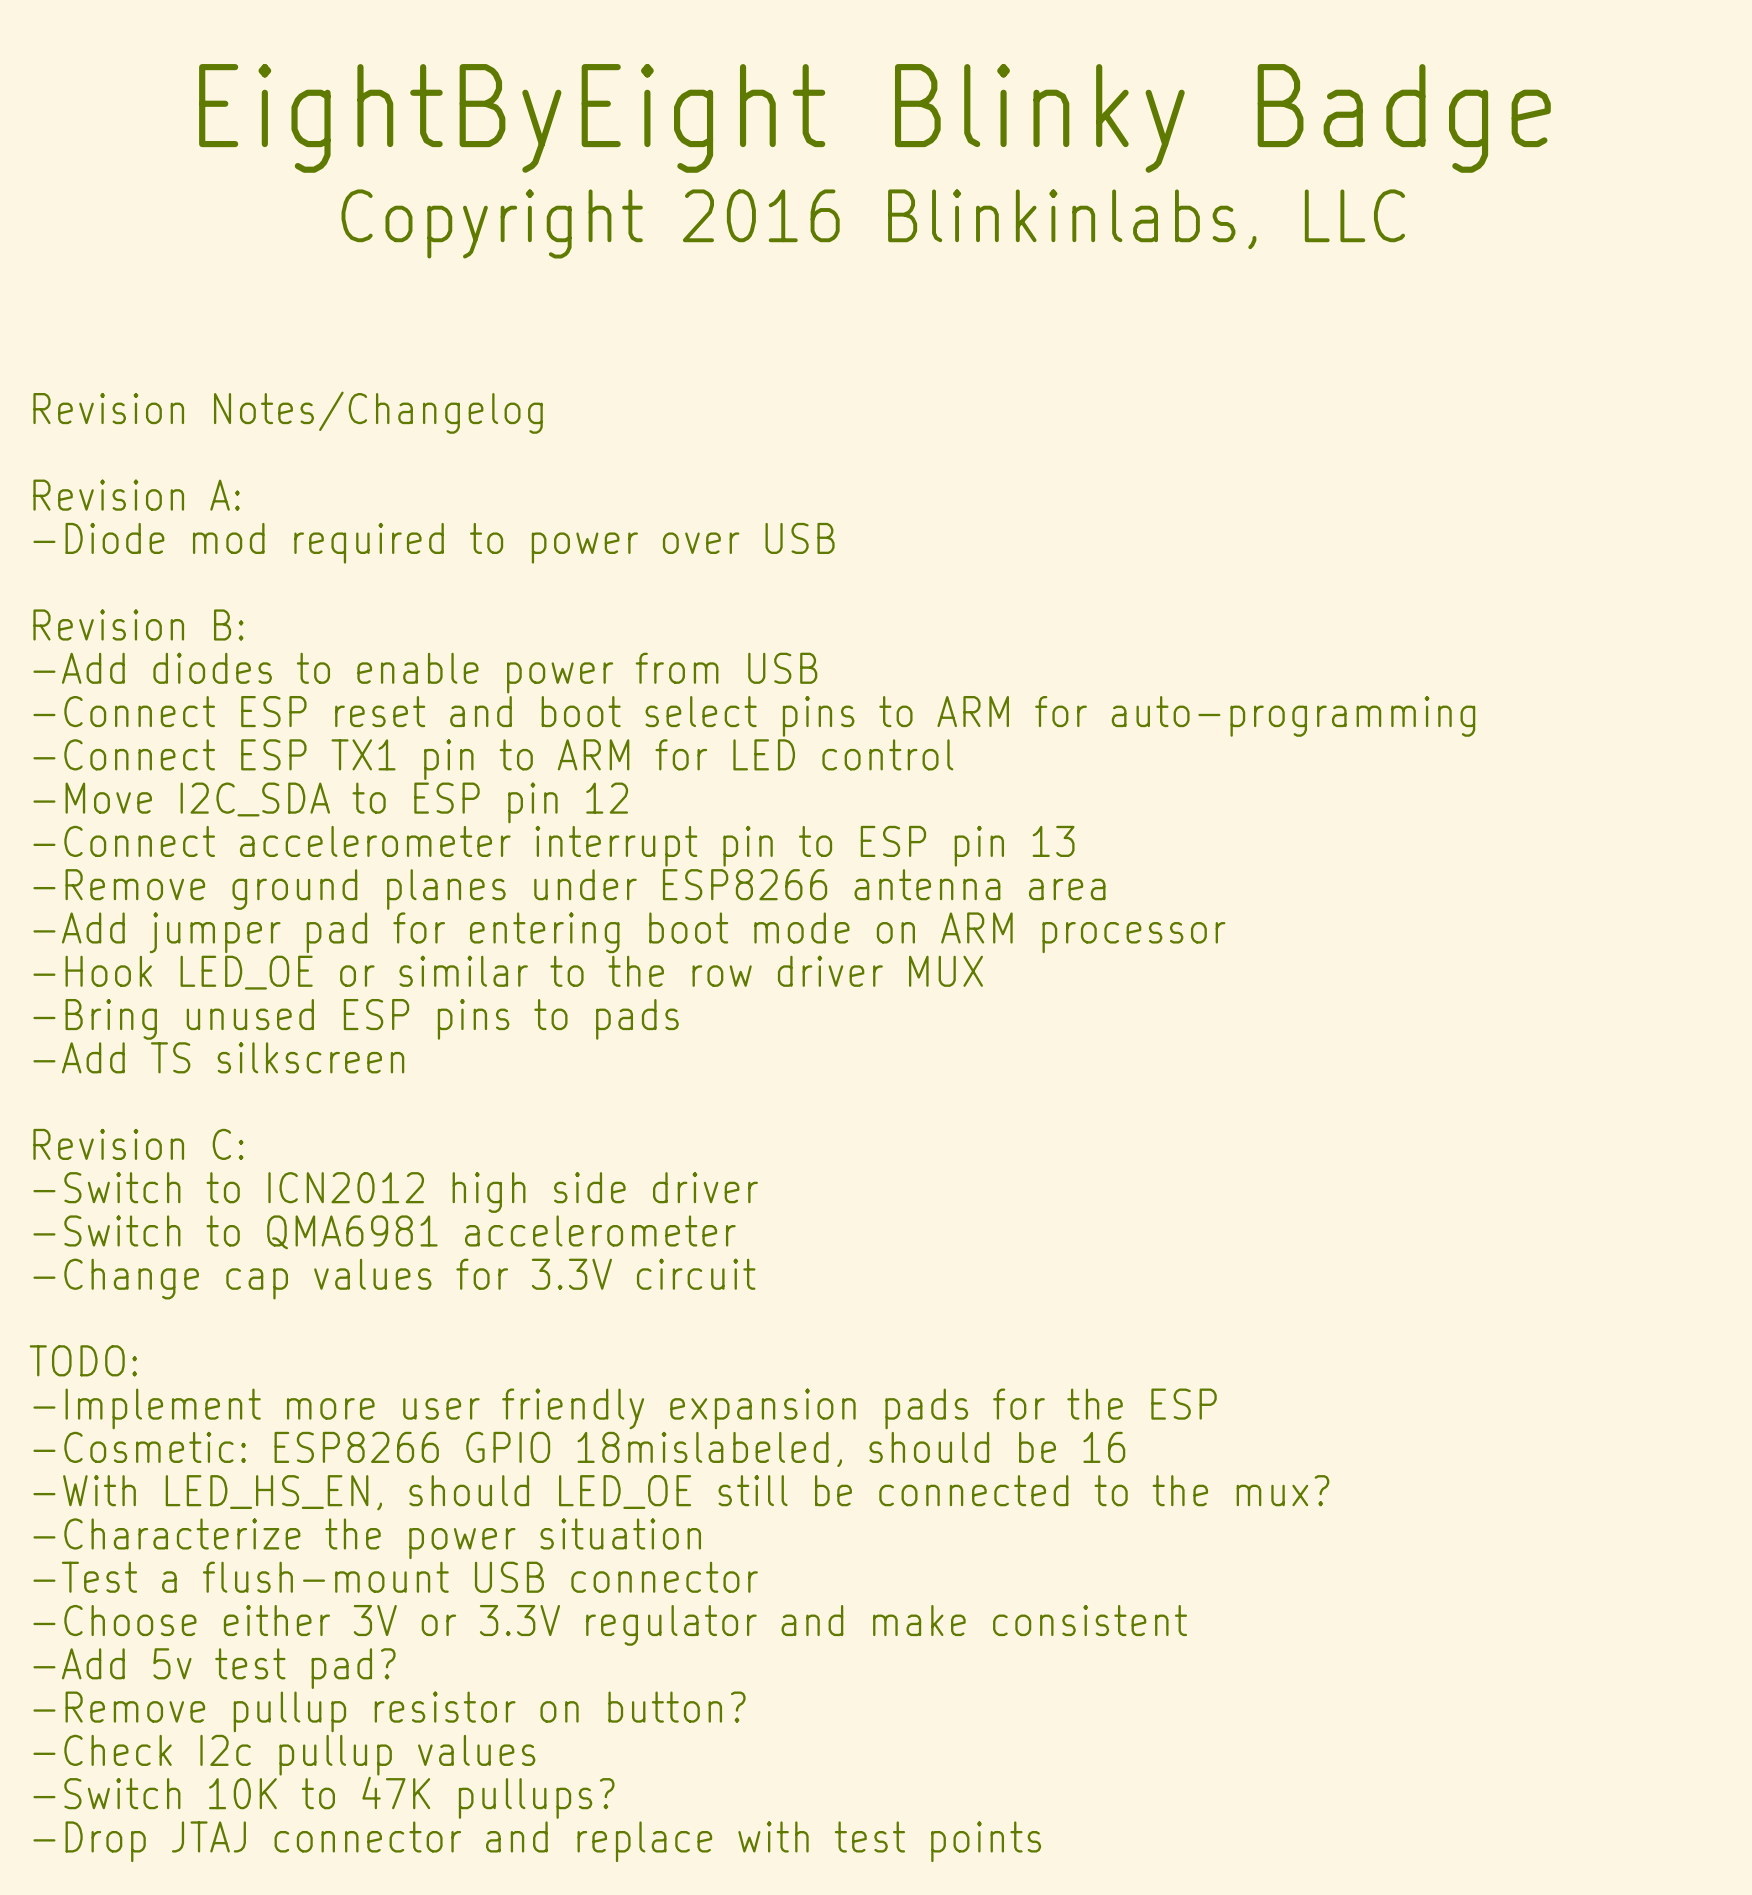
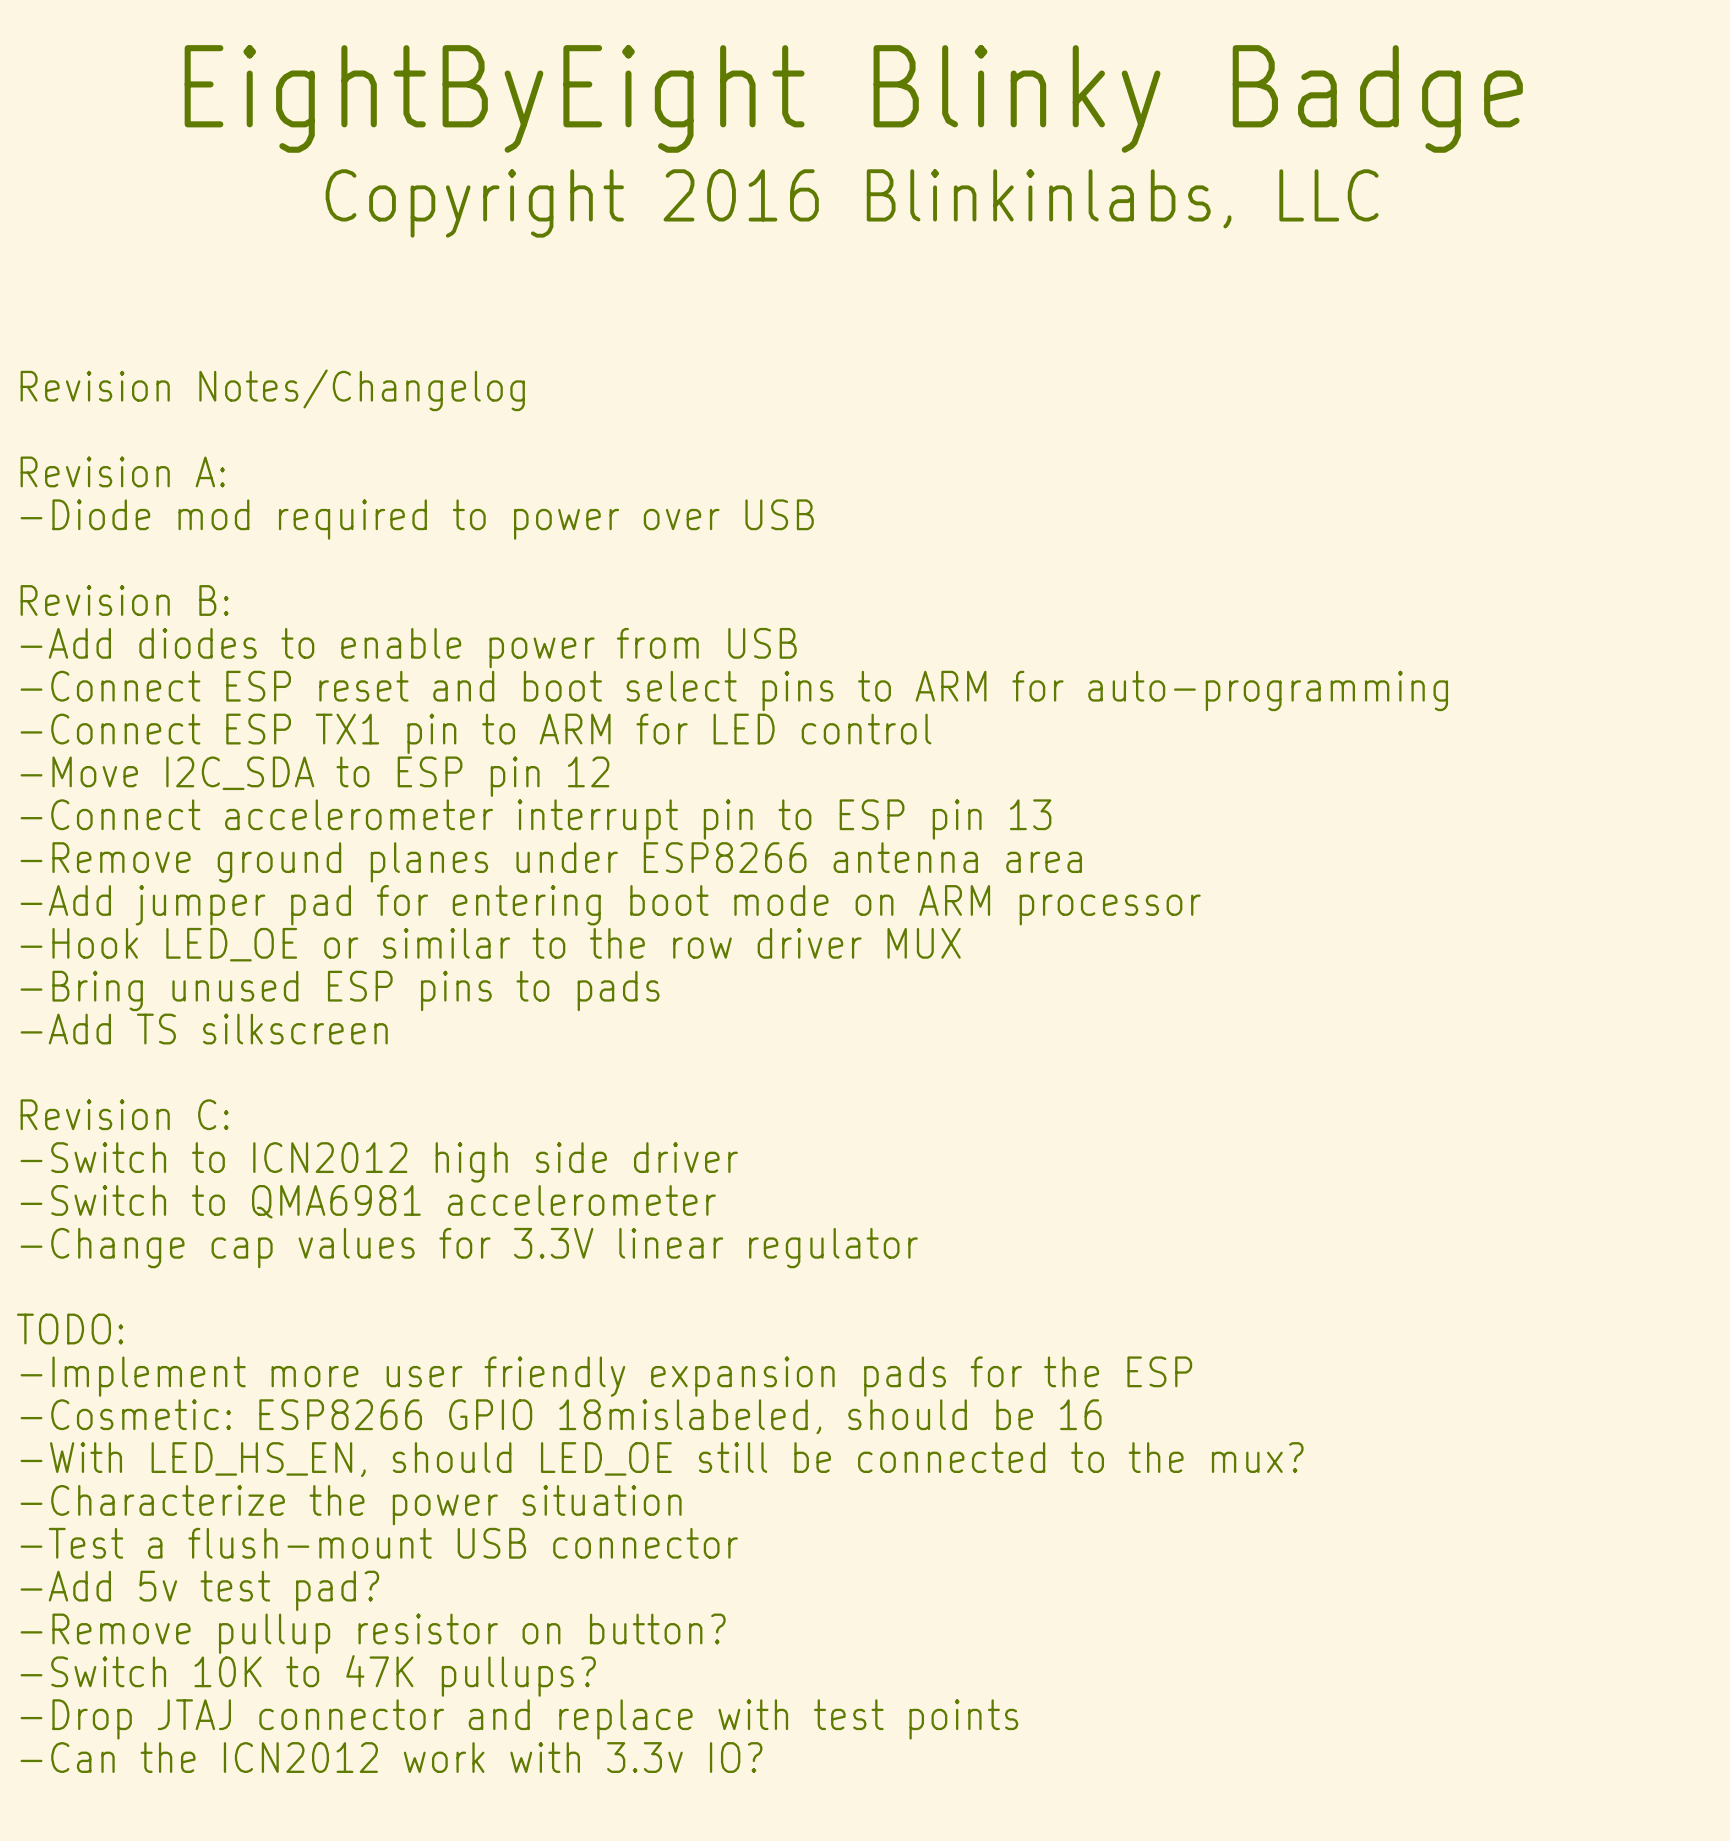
text: -Change cap values for 3.3V circuit (394, 1279) -> -Change cap values for 3.3V linear regulator (469, 1248)
text: -Choose either 3V or 3.3V regulator and make consistent (610, 1625) -> -Add 5v test pad? (199, 1590)
text: -Add 5v test pad? (214, 1668) -> -Remove pullup resistor on button? (373, 1633)
text: -Remove pullup resistor on button? (389, 1711) -> -Switch 10K to 47K pullups? (308, 1675)
text: -Check I2c pullup values (284, 1755) -> -Drop JTAJ connector and replace with test points (519, 1719)
text: -Switch 10K to 47K pullups? (323, 1797) -> -Can the ICN2012 work with 3.3v IO? (391, 1757)
text: -Drop JTAJ connector and replace with test points (537, 1841) -> none

